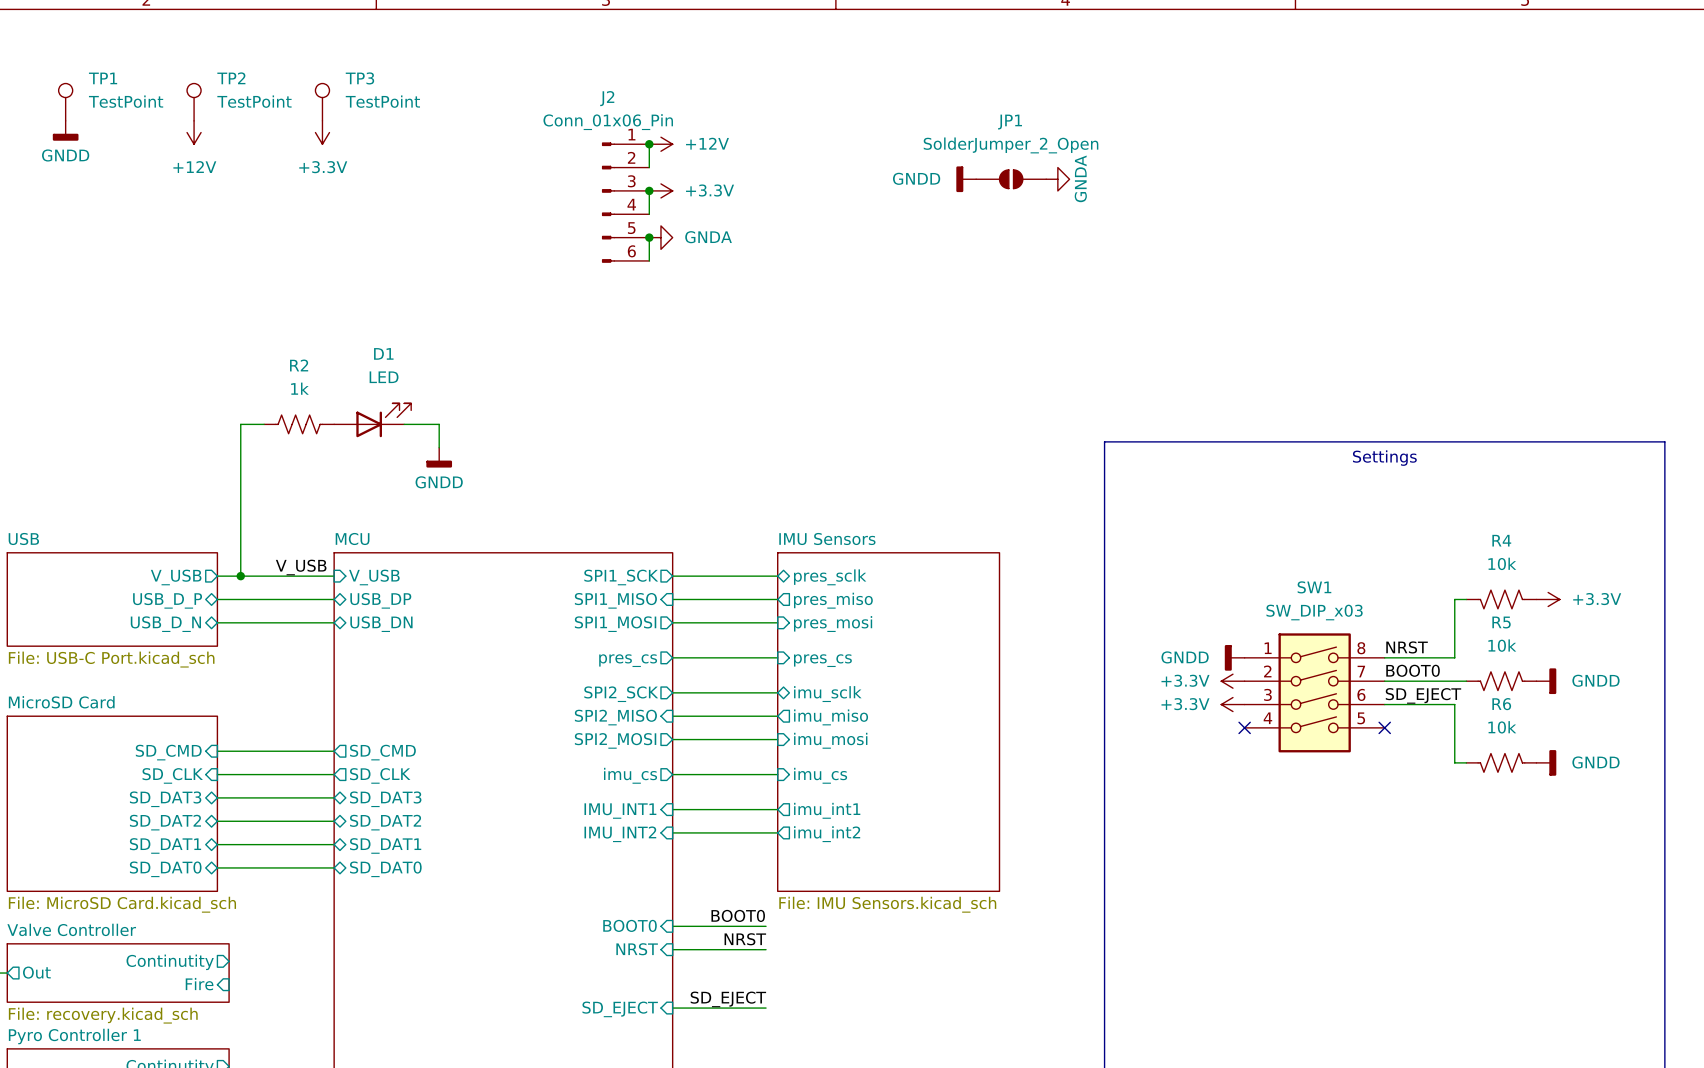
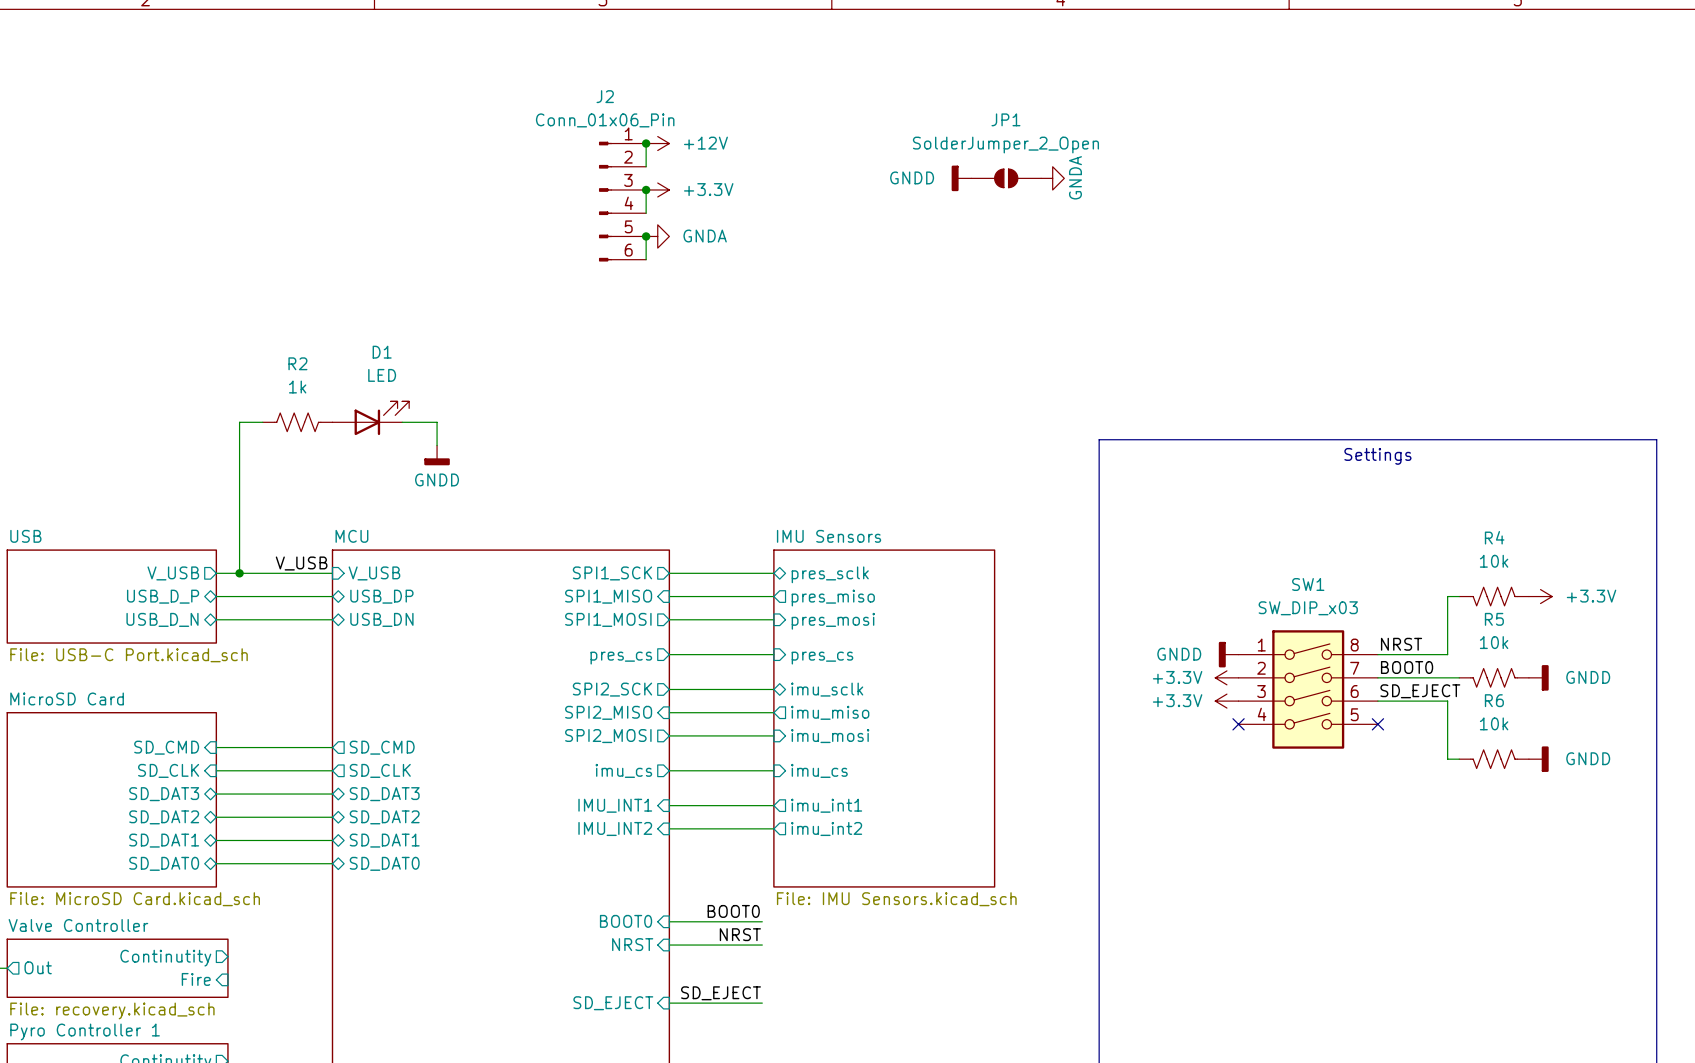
TP1: TestPoint (65, 102) -> none
TP2: TestPoint (194, 102) -> none
TP3: TestPoint (322, 102) -> none
power symbol: GNDD (65, 130) -> none
power symbol: +12V (194, 132) -> none
power symbol: +3.3V (322, 132) -> none

